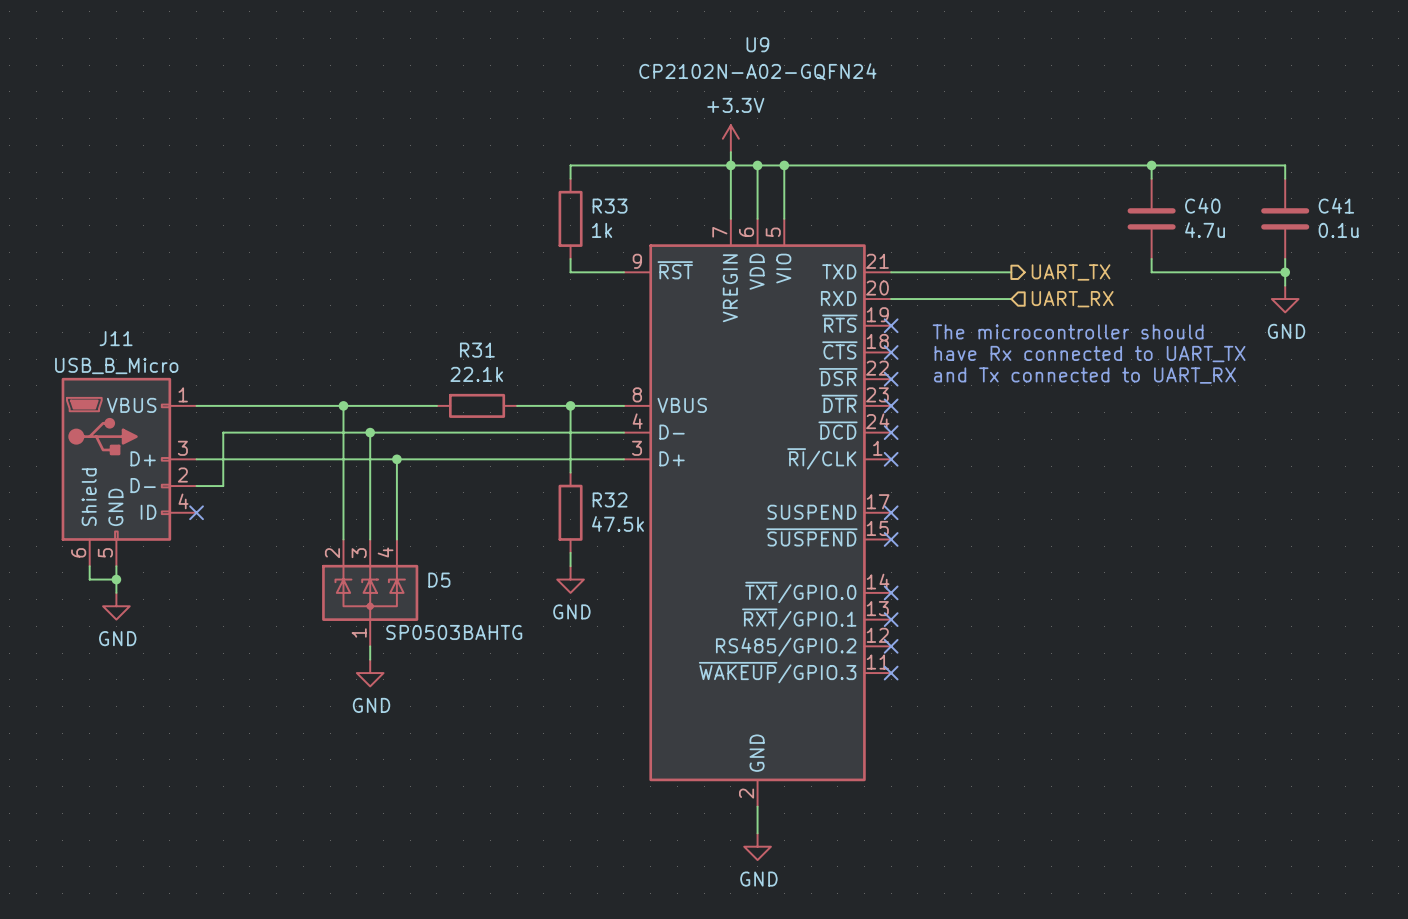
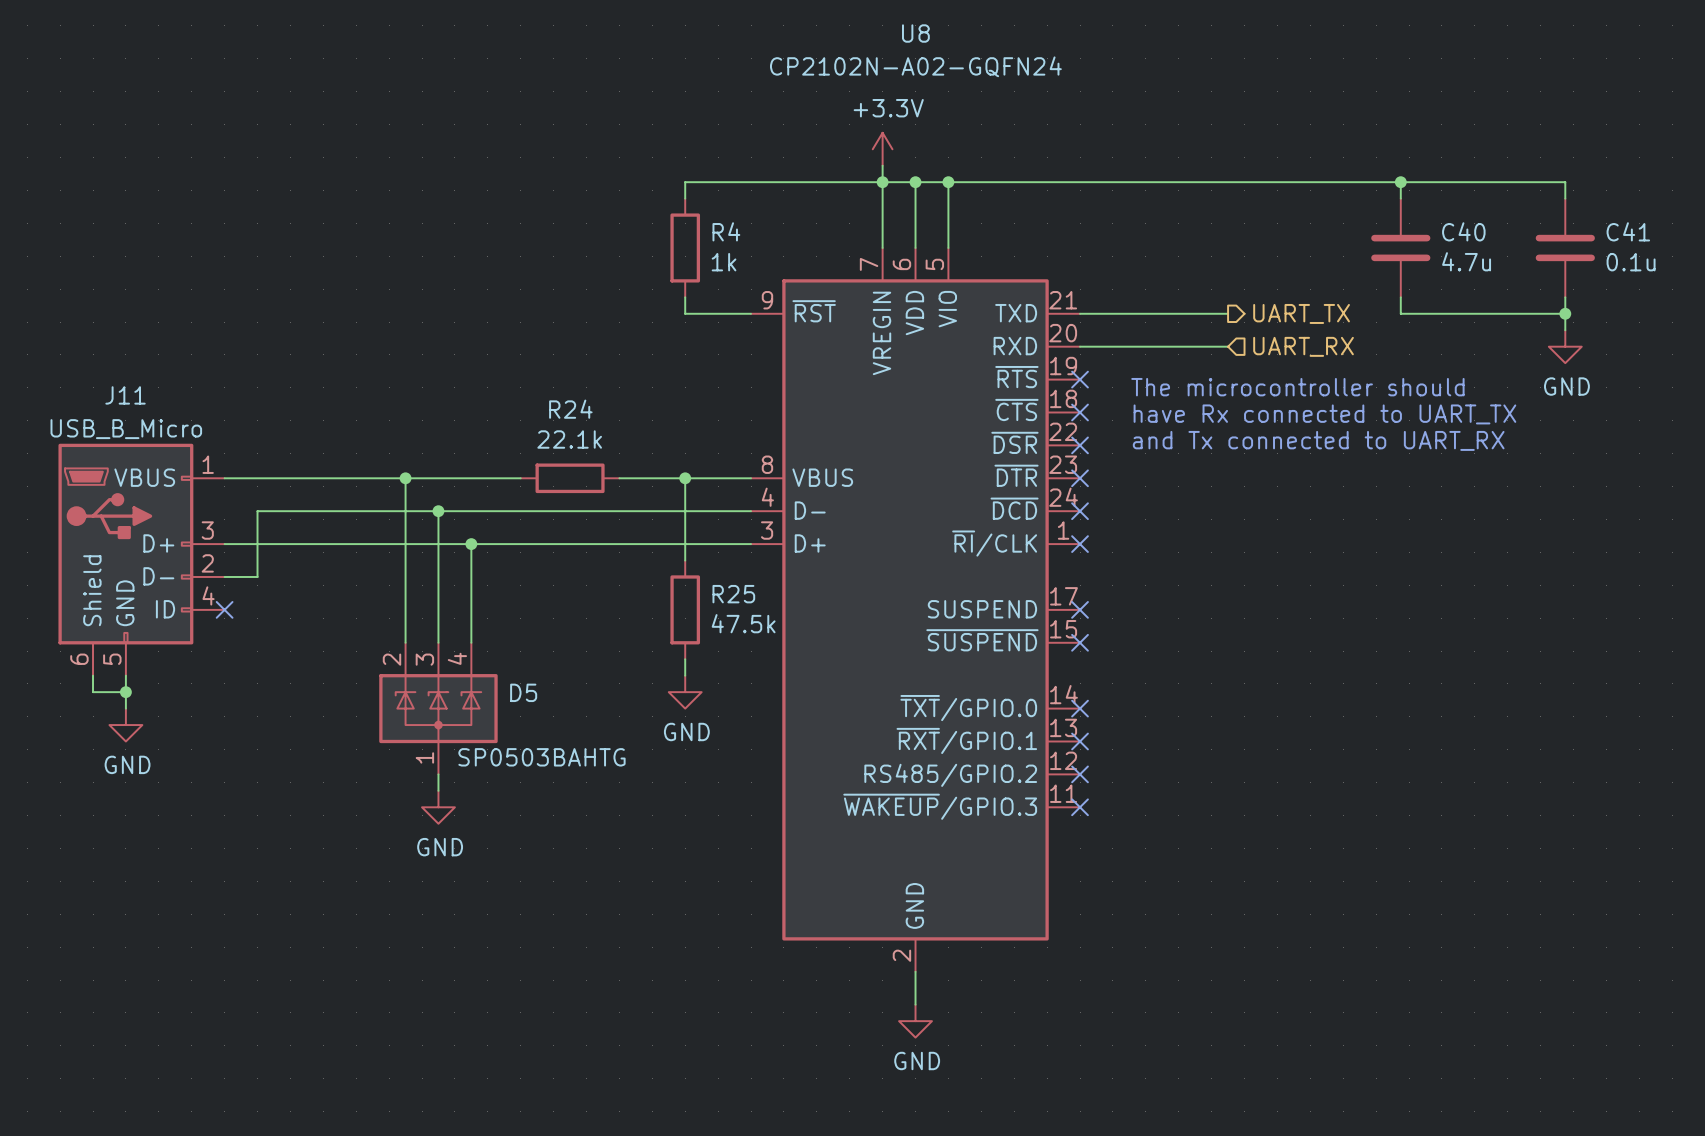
U9 name: U9 (757, 44) -> U8 (915, 33)
R33 name: R33 (610, 206) -> R4 (726, 231)
R31 name: R31 (477, 350) -> R24 (570, 409)
R32 name: R32 (610, 499) -> R25 (733, 594)

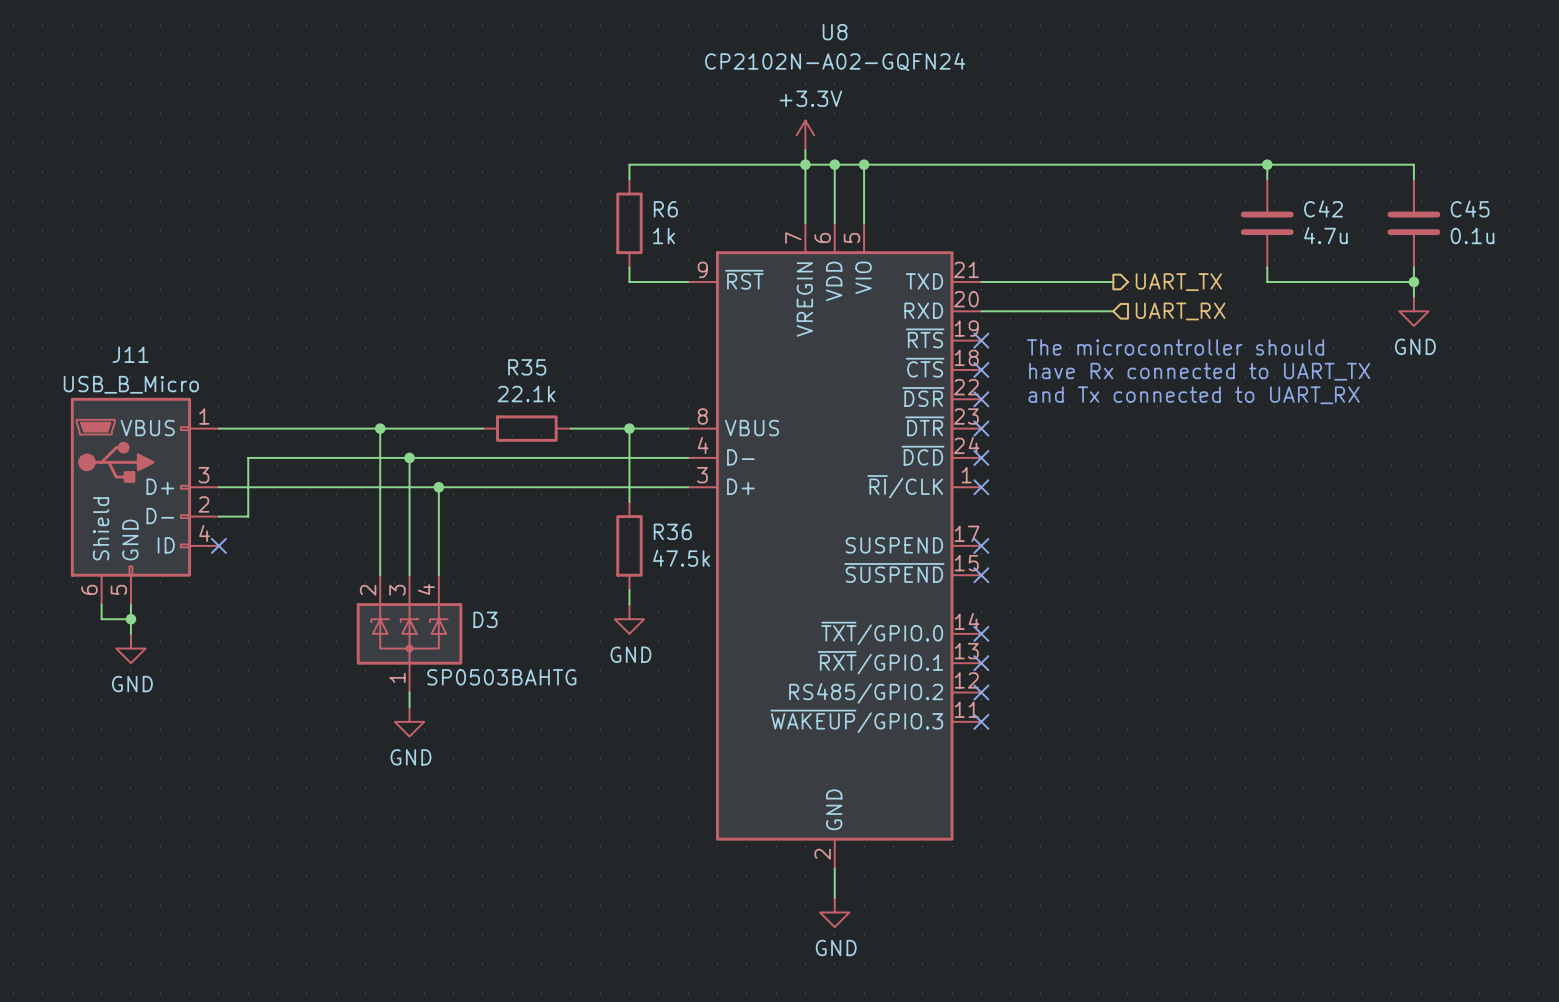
R4 name: R4 (726, 231) -> R6 (665, 209)
C40 name: C40 (1463, 231) -> C42 (1323, 208)
C41 name: C41 (1628, 231) -> C45 (1470, 208)
R24 name: R24 (570, 409) -> R35 (527, 367)
R25 name: R25 (733, 594) -> R36 (672, 531)
D5 name: D5 (523, 692) -> D3 (485, 619)

